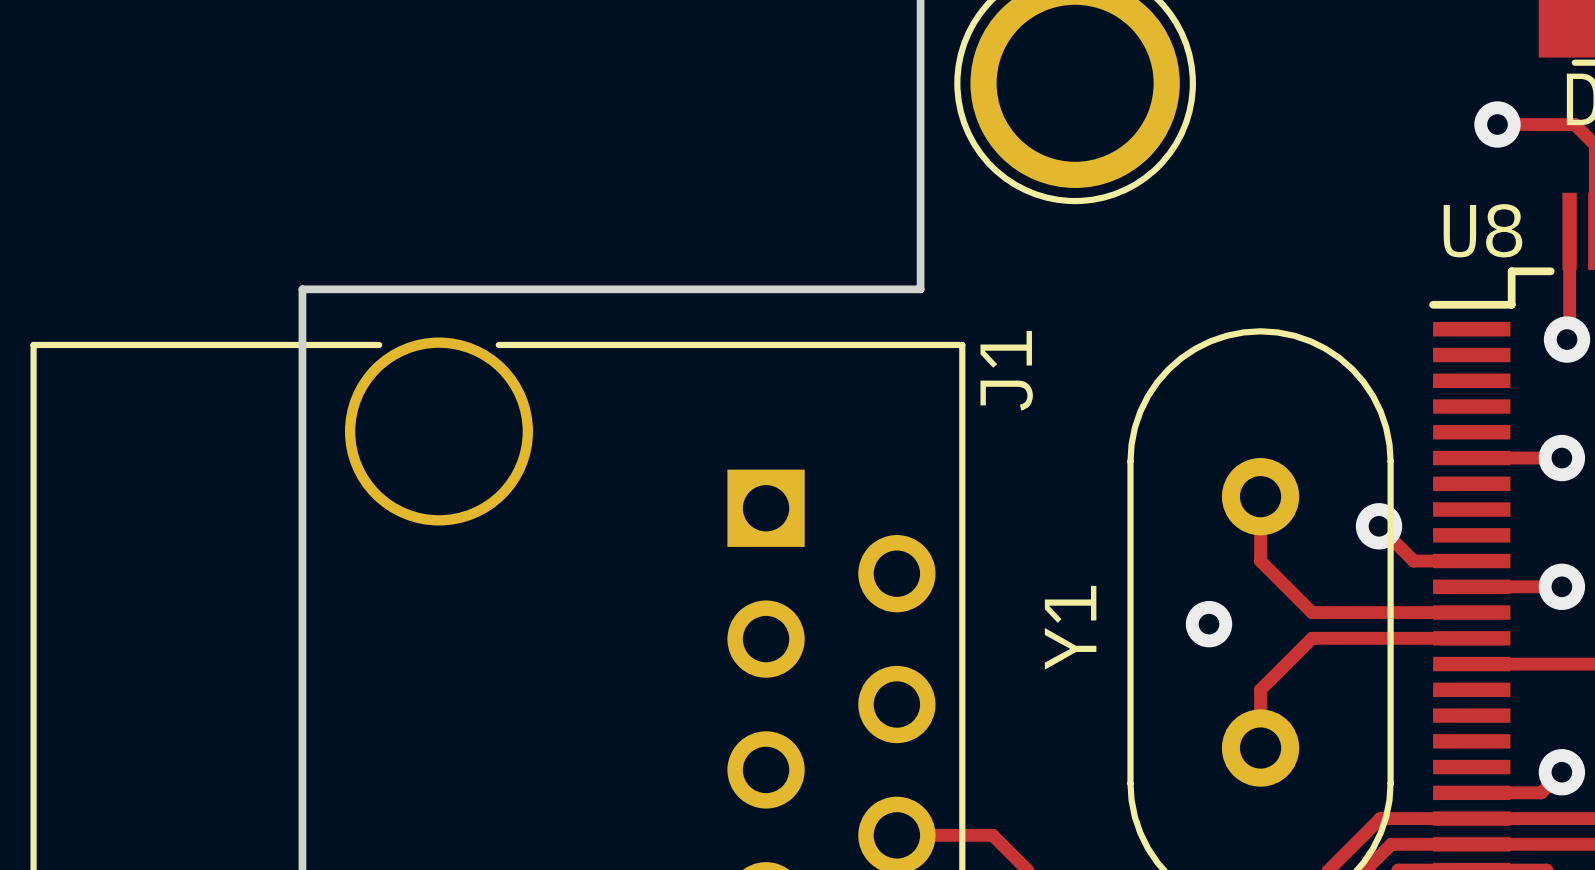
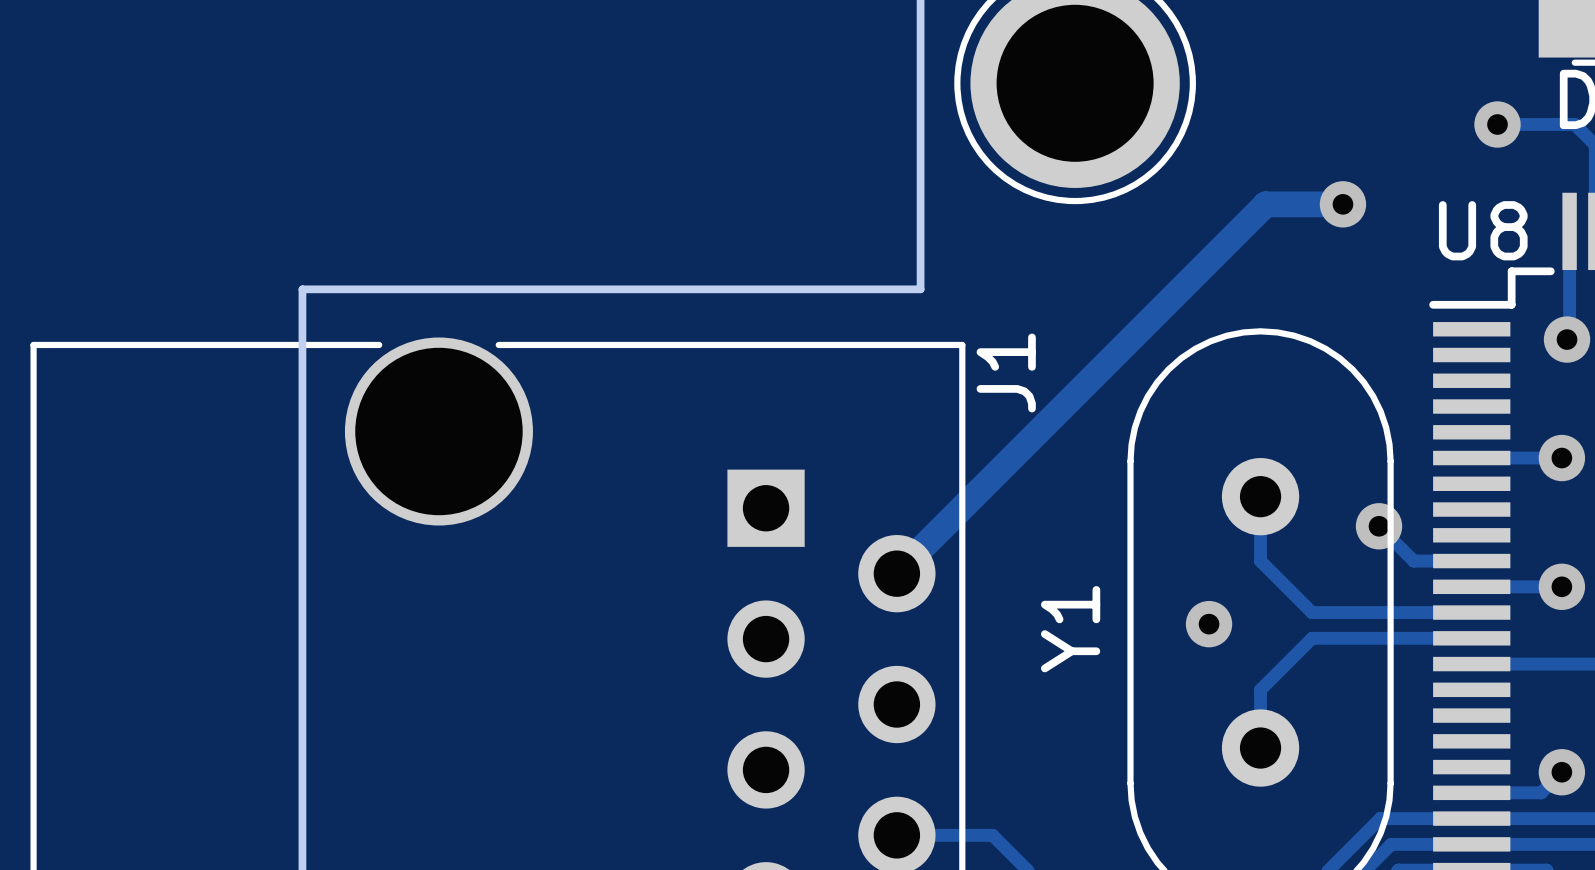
track: none -> (1342, 204) (1265, 204) (896, 573)
via: none -> (1342, 204)

